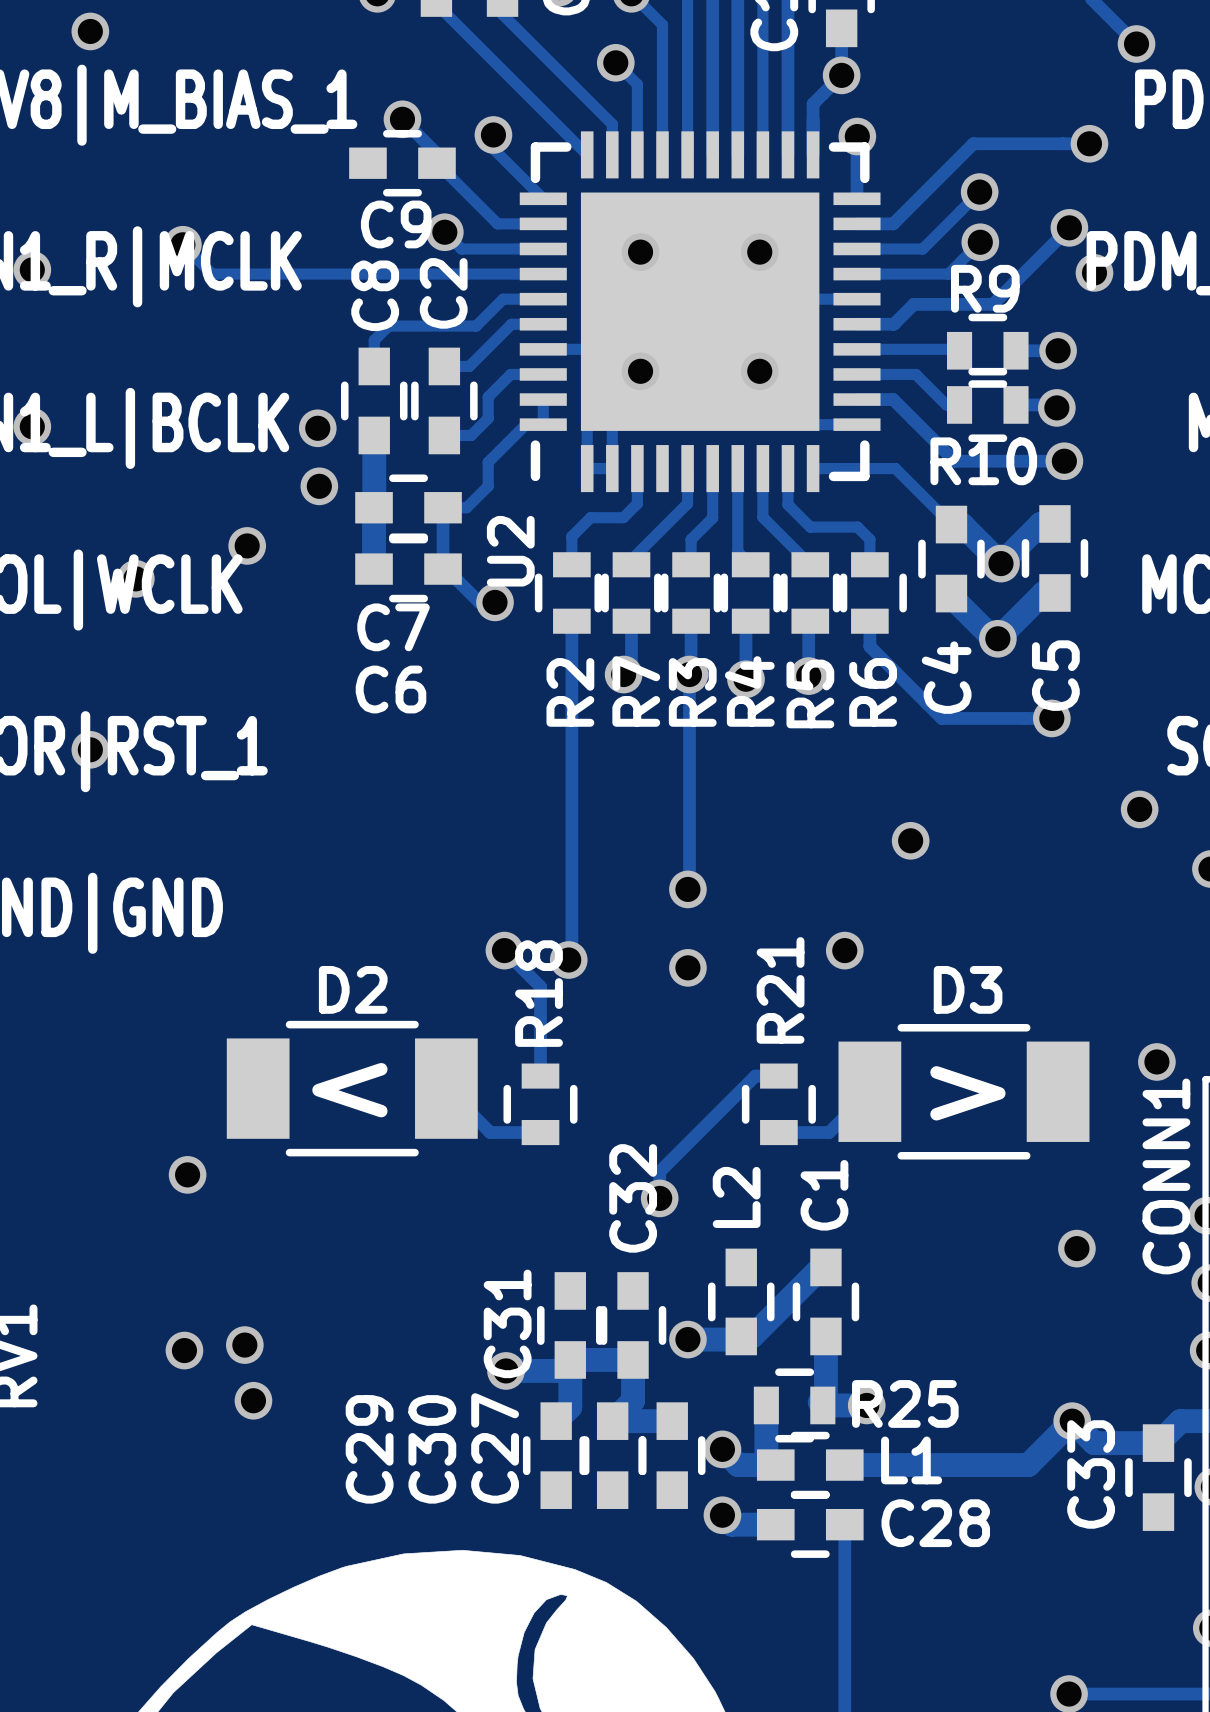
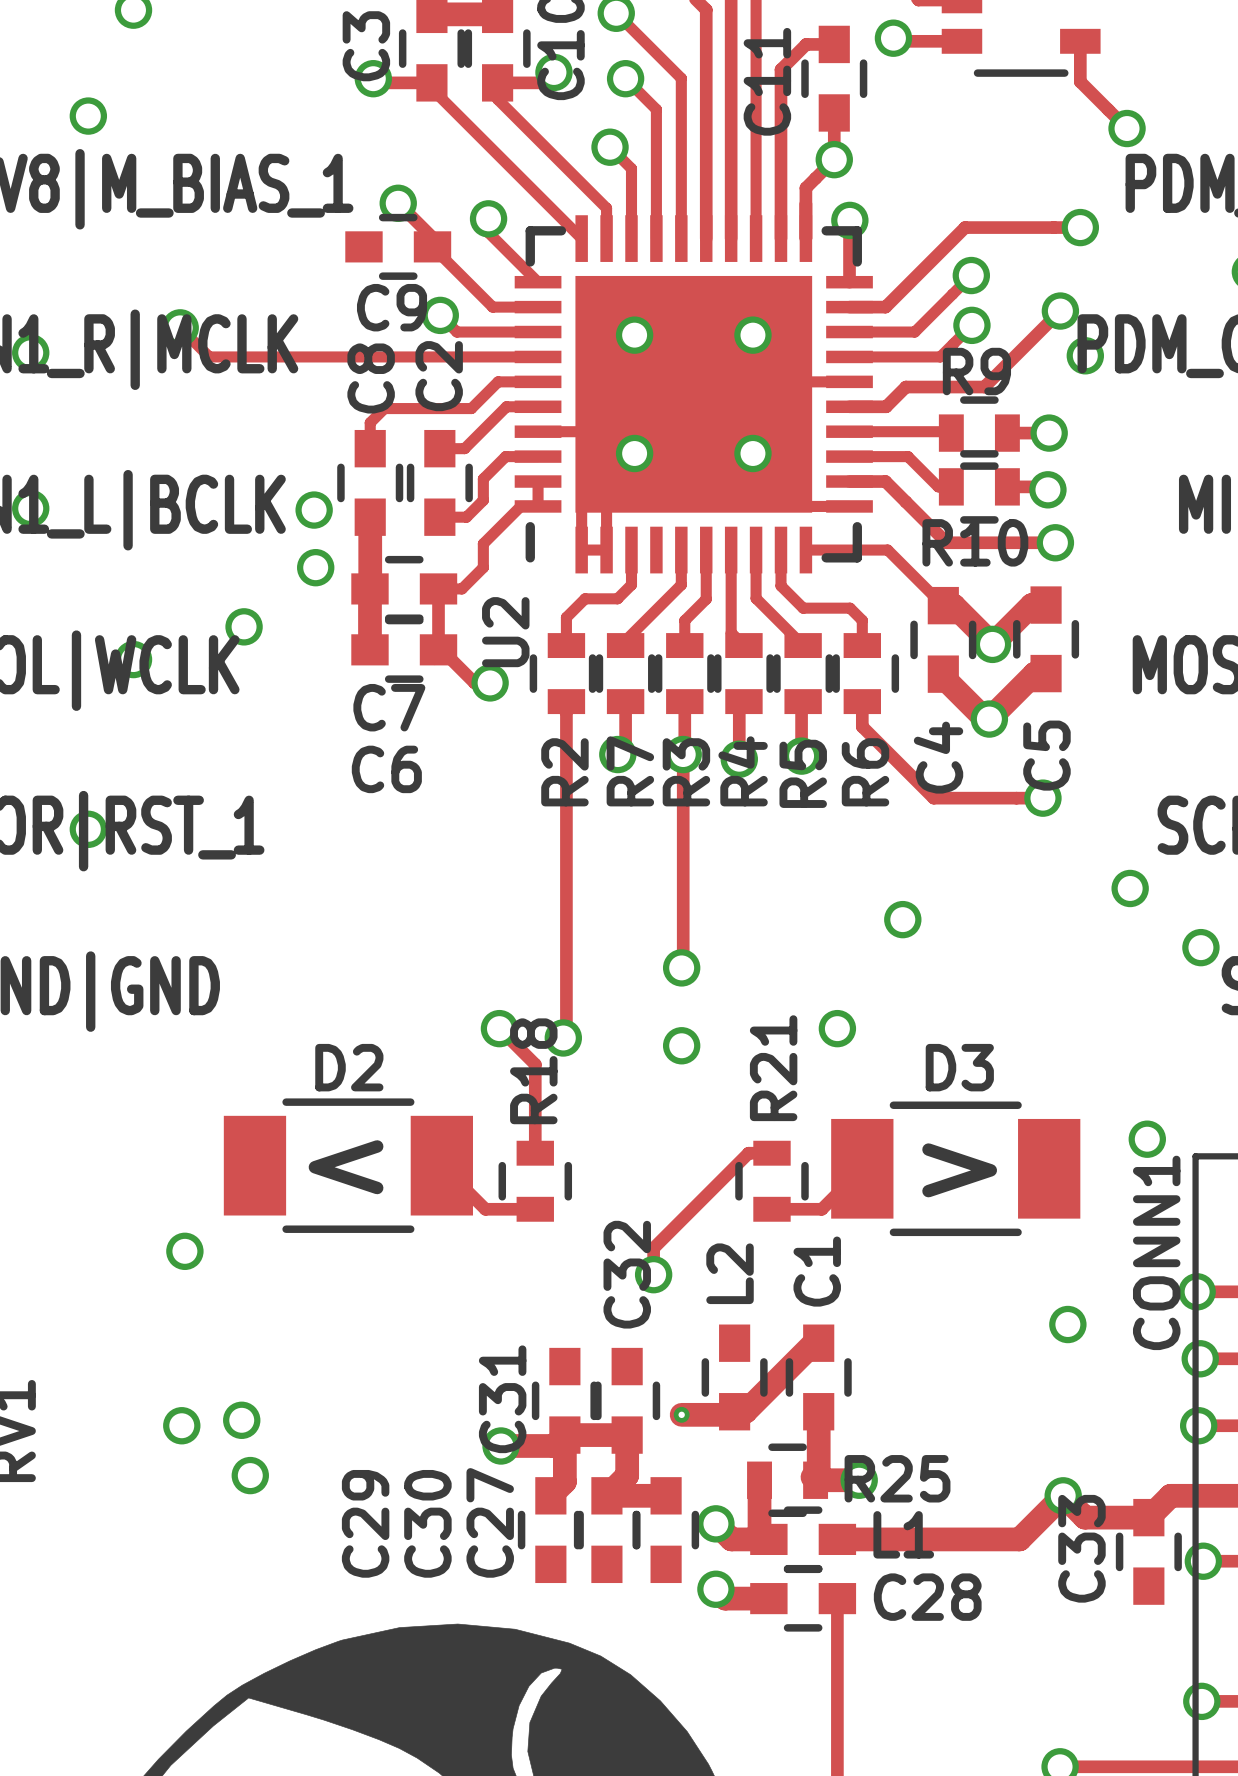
via size: [669, 1320, 707, 1359] -> [673, 1406, 690, 1423]

